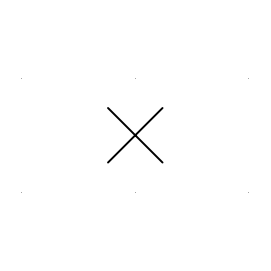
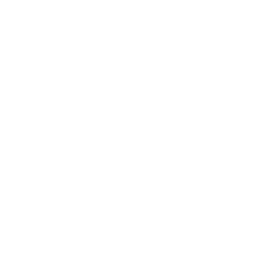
no-connect mark: (135, 135) -> none

